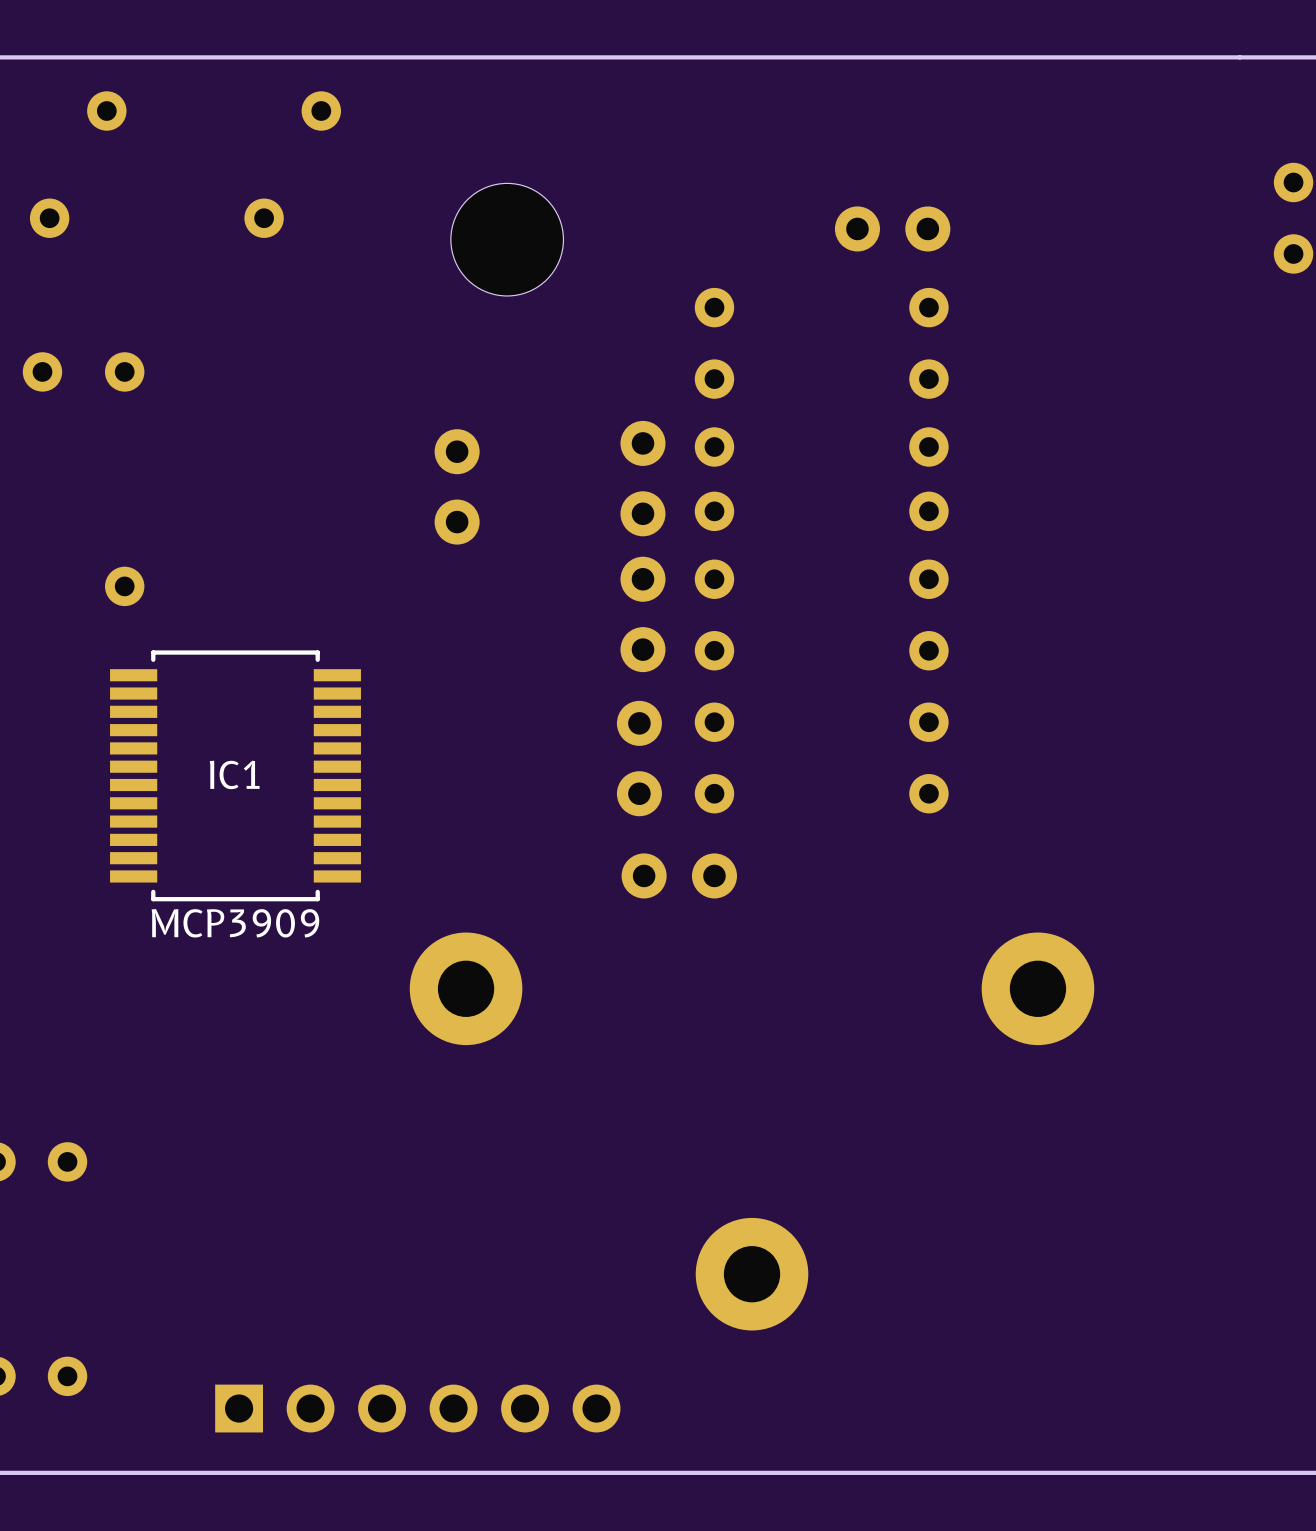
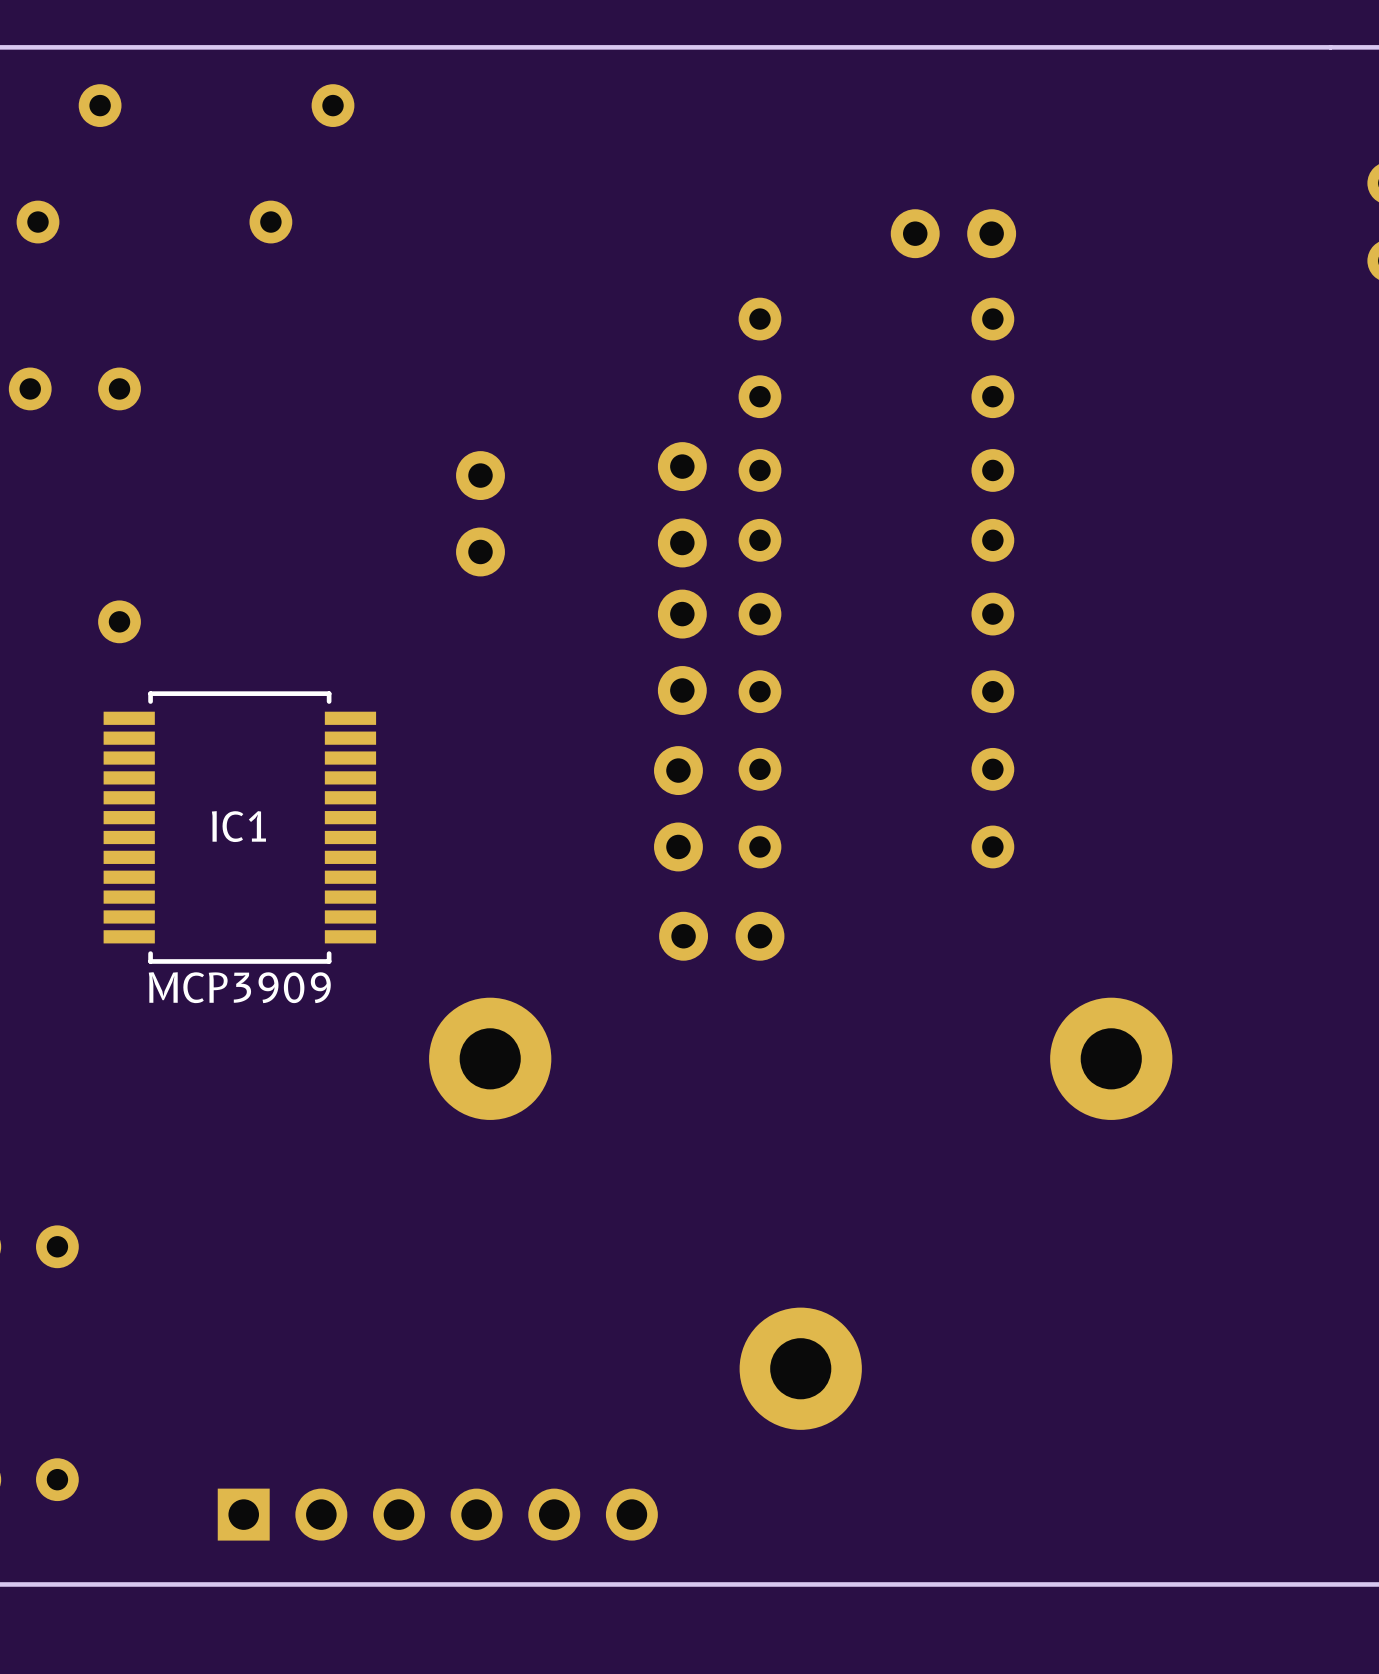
part: (507, 239) -> none

